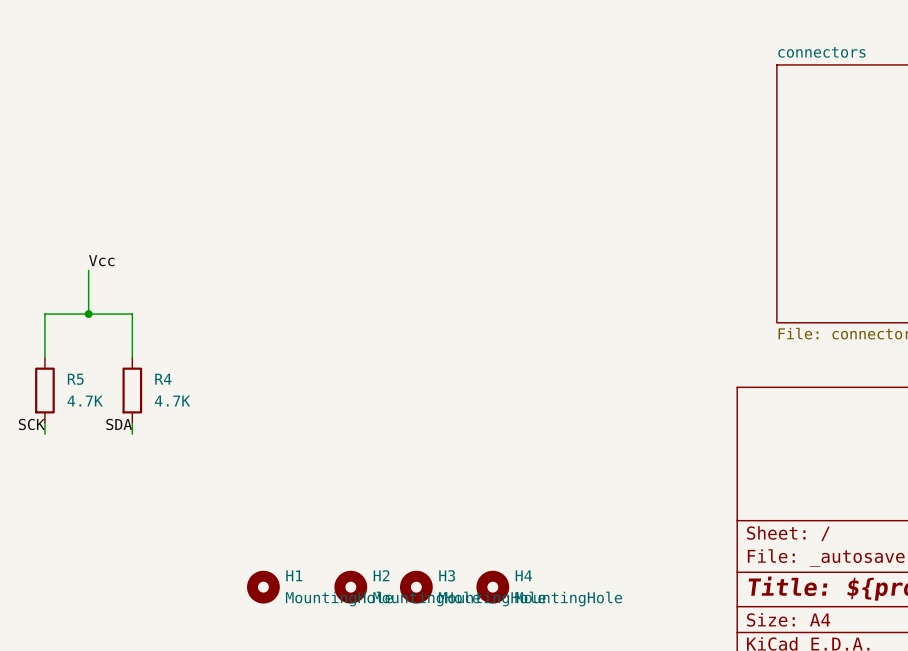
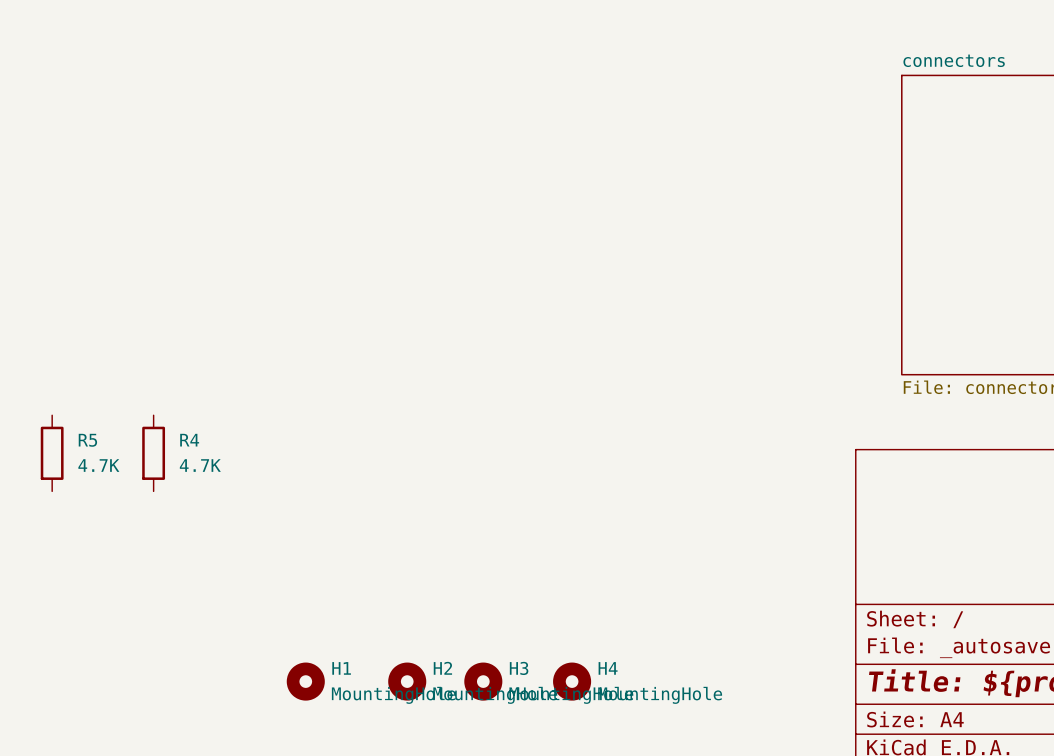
label: Vcc (101, 260) -> none
wire: (88, 270) (88, 314) -> none
junction: (88, 314) -> none
wire: (44, 357) (44, 314) (132, 314) (132, 357) -> none
wire: (44, 423) (44, 434) -> none
wire: (132, 423) (132, 434) -> none
label: SCK (31, 424) -> none
label: SDA (119, 424) -> none

